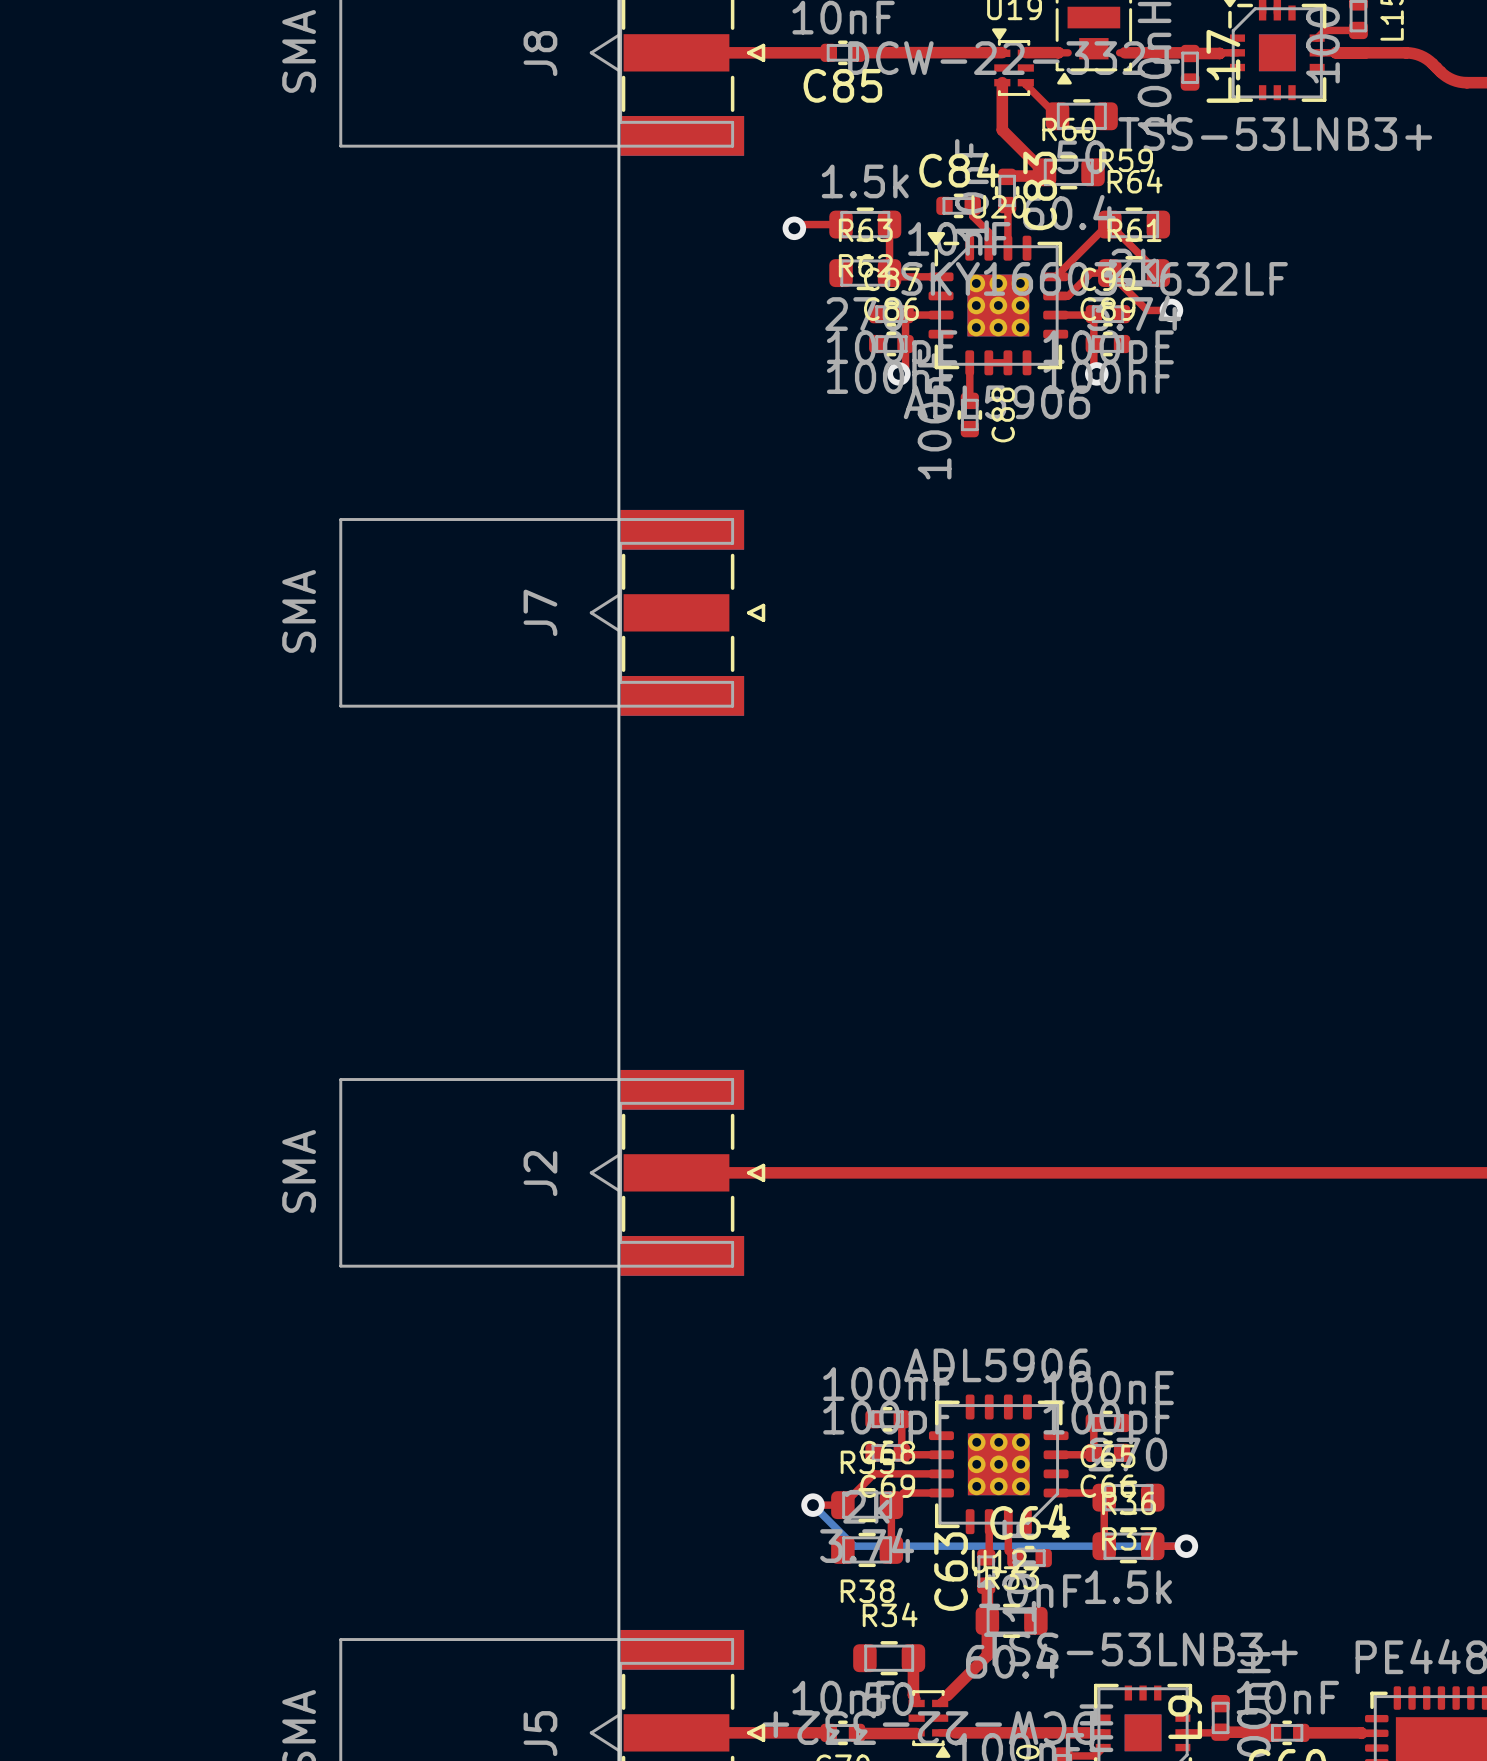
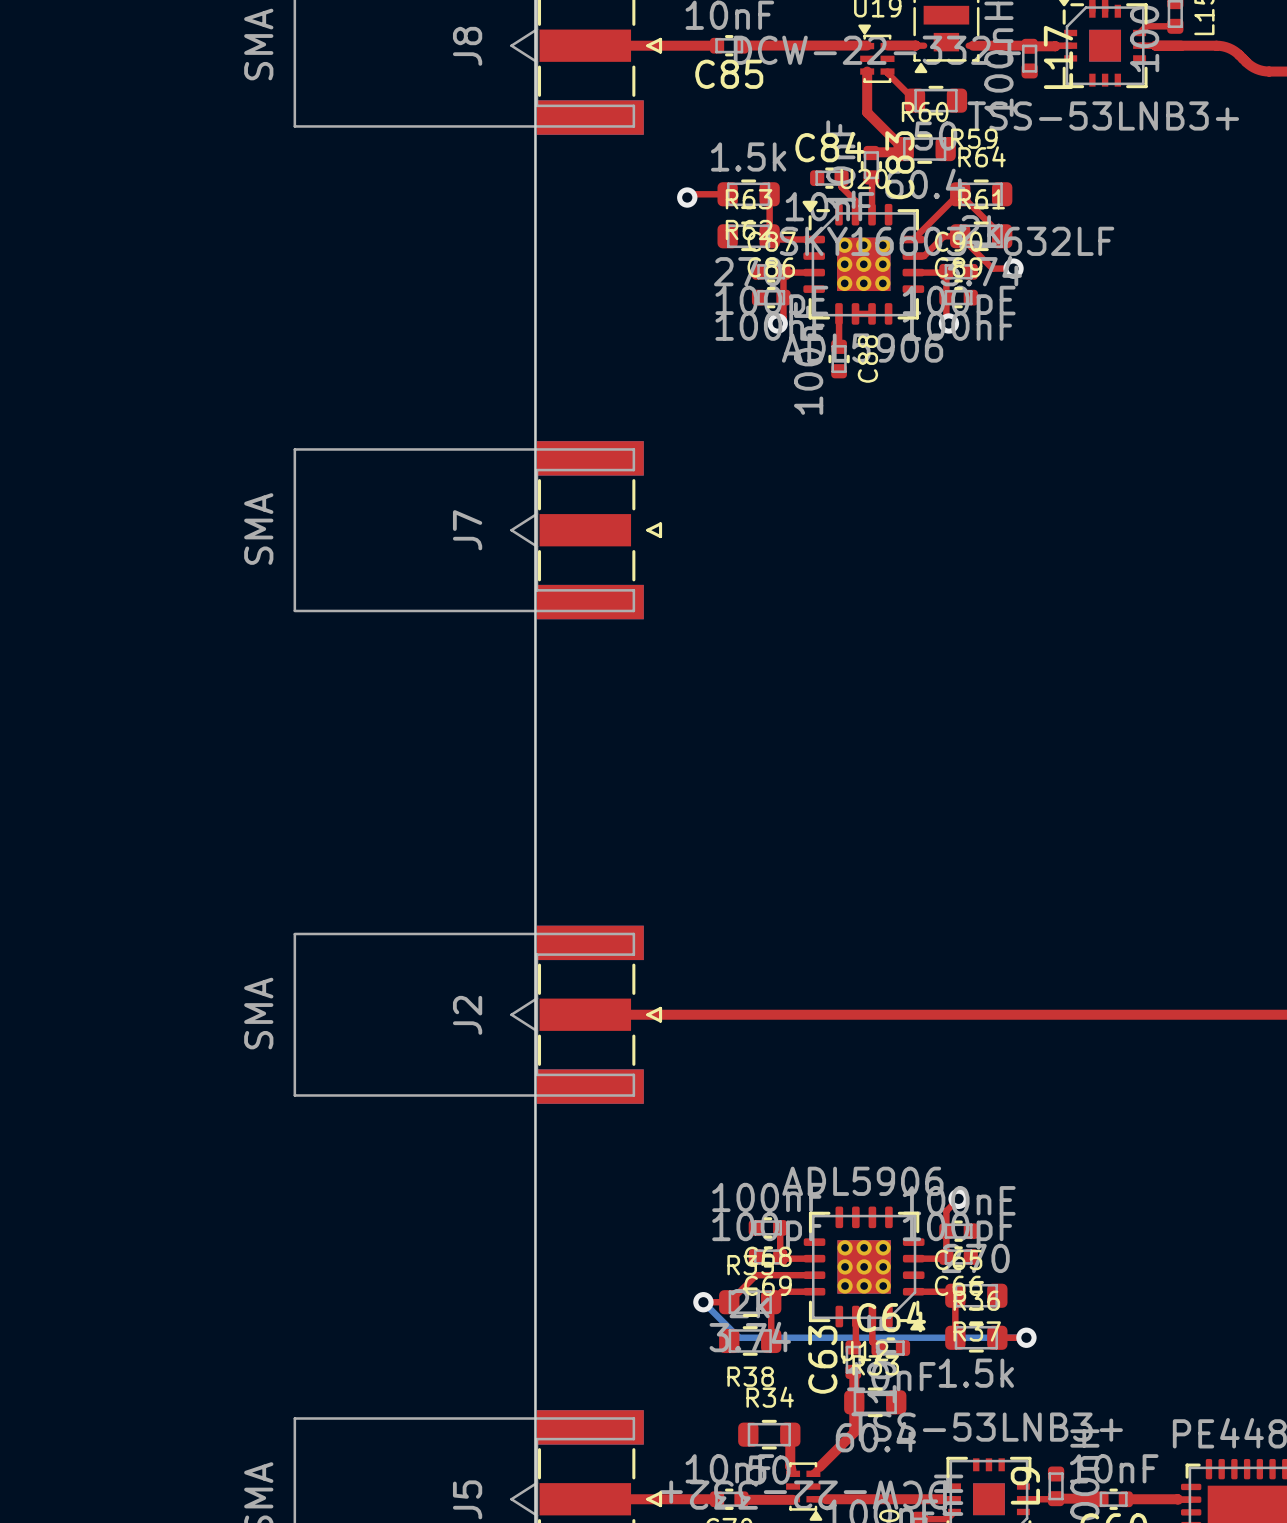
top track: none -> (958, 1198) (946, 1211) (946, 1231)
via: none -> (958, 1198)

